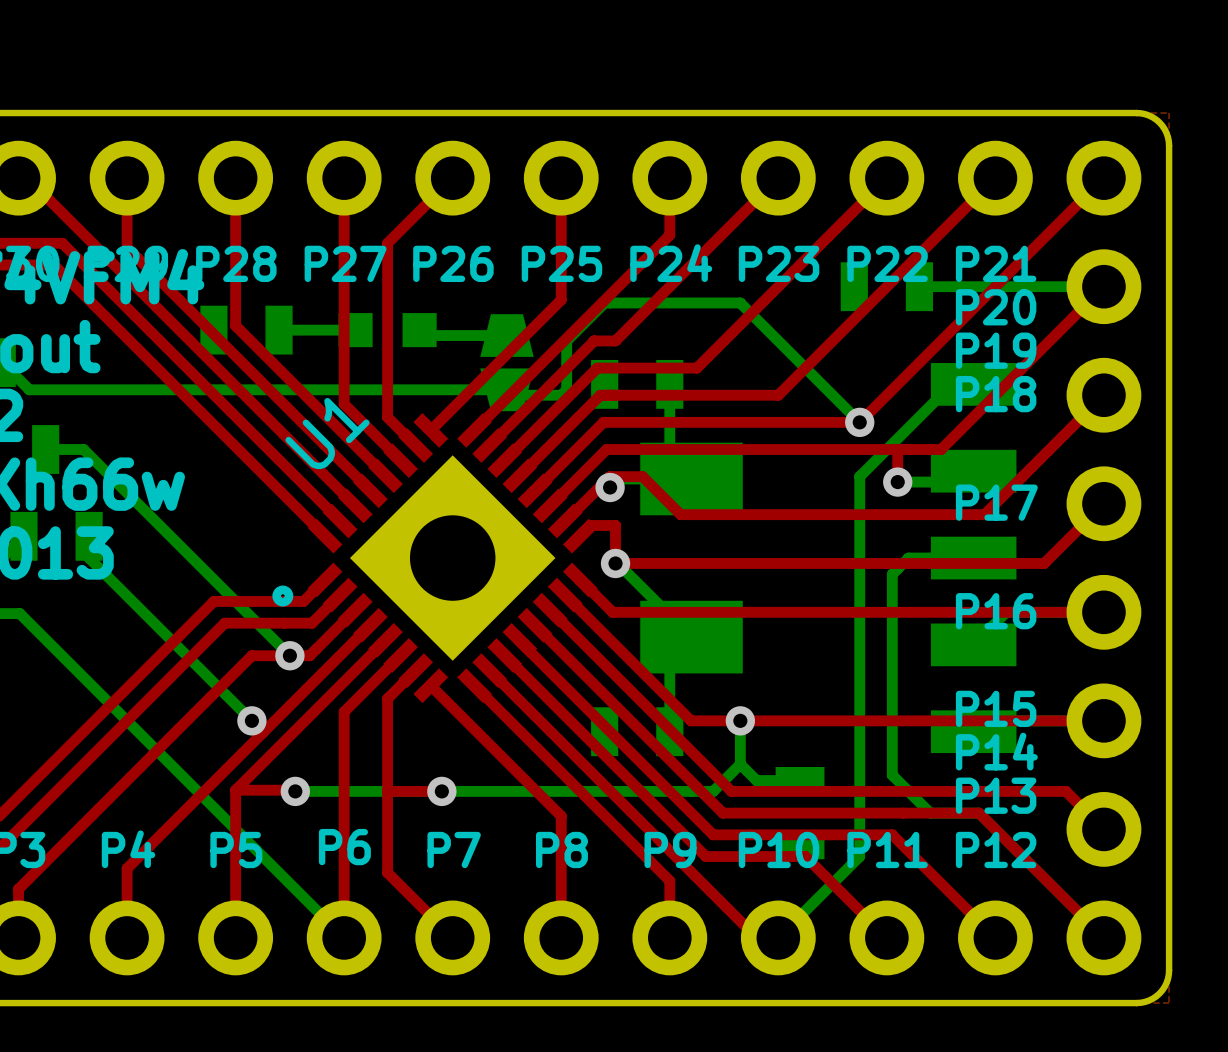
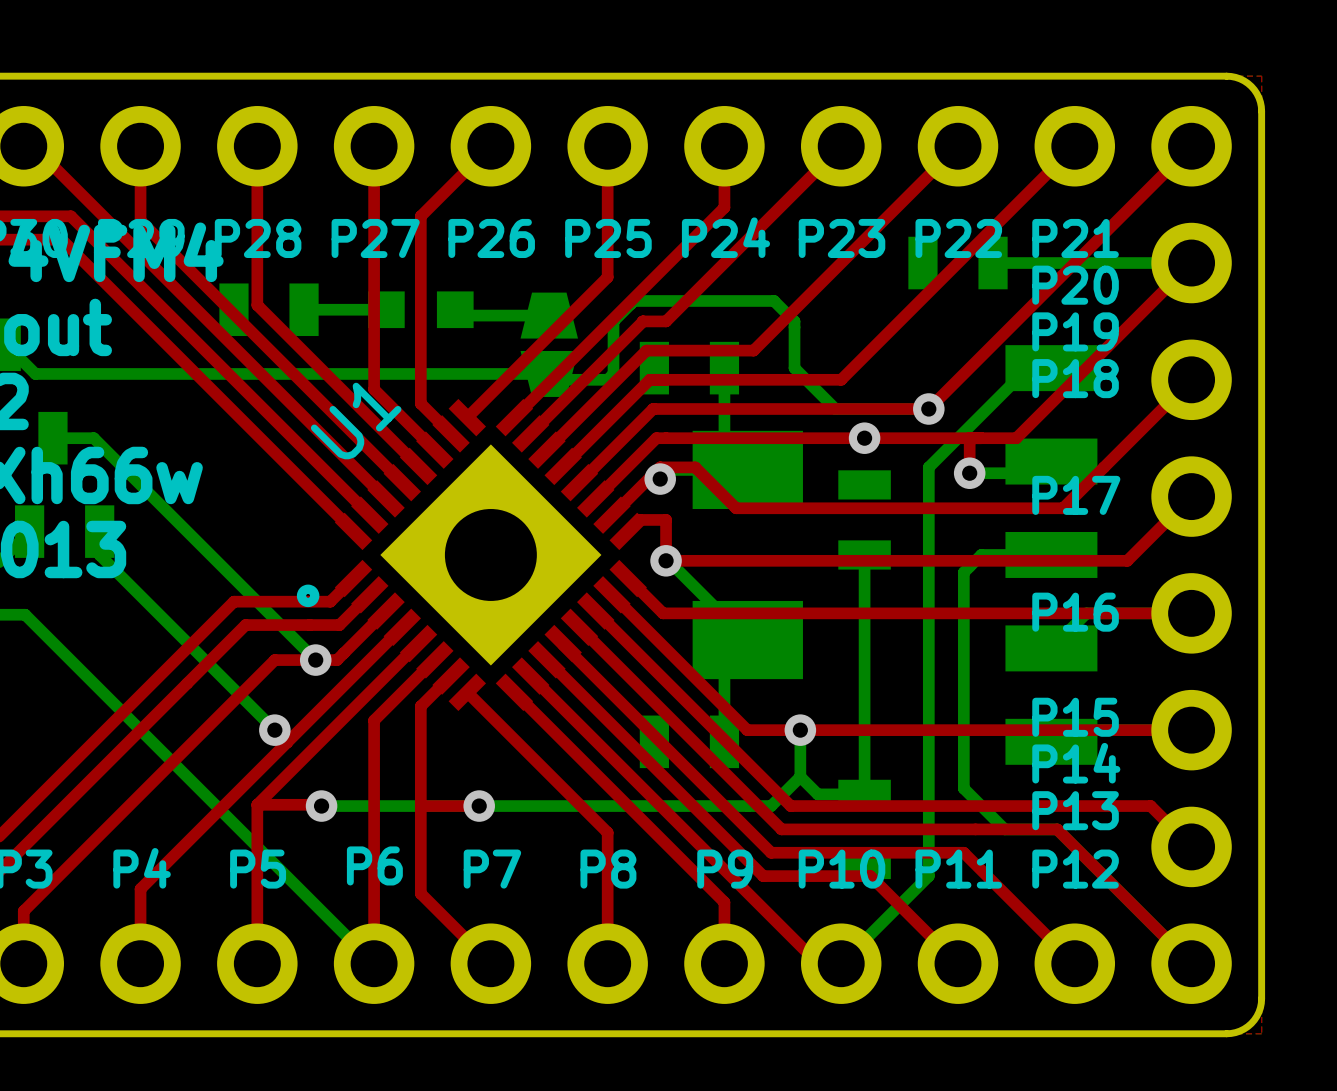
bottom track: (585, 321) (604, 302) (740, 302) (859, 422) -> (633, 300) (774, 300) (794, 321) (794, 368) (835, 409) (928, 409)
via: none -> (864, 438)
part: none -> (864, 519)
bottom track: none -> (864, 554) (864, 794)

